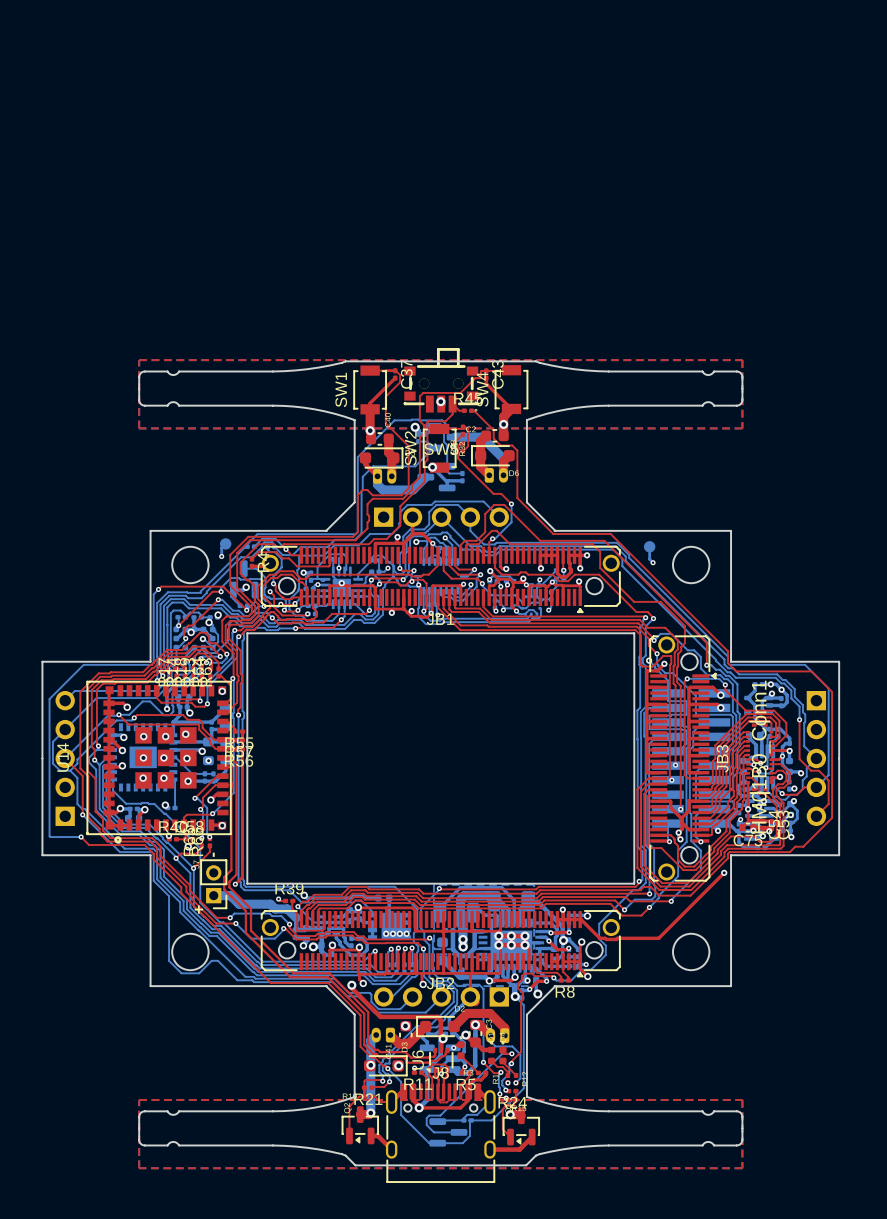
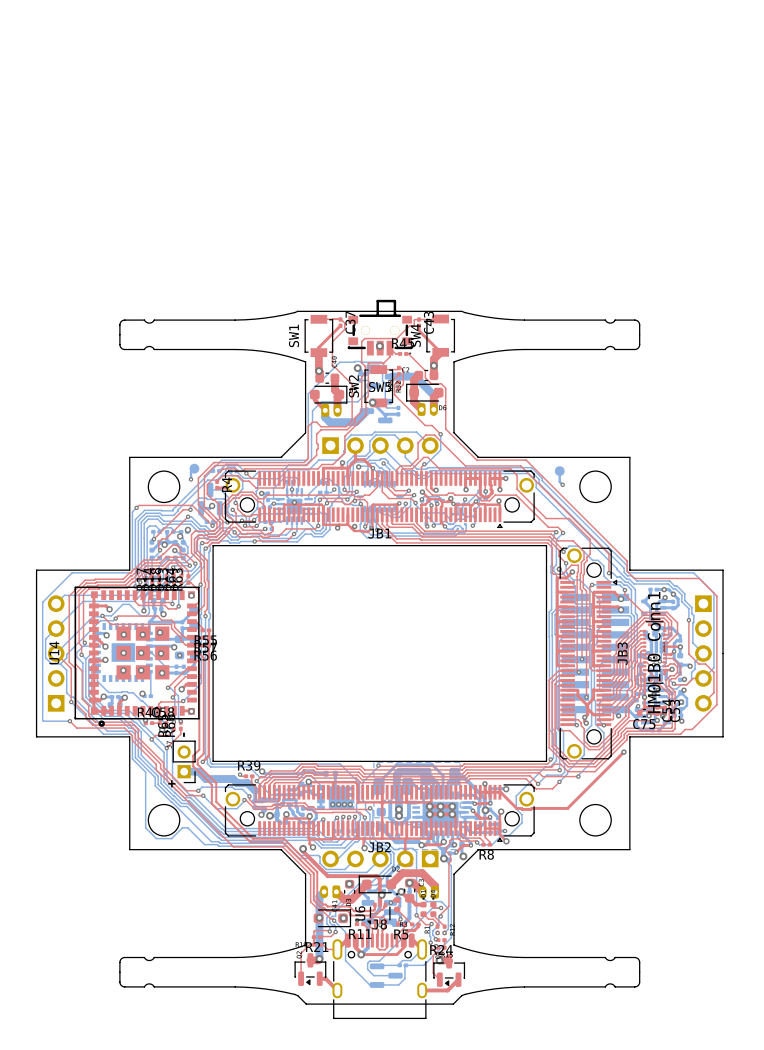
top zone outline: (139, 360) (742, 360) (742, 428) (139, 428) (139, 360) -> none
top zone outline: (139, 1099) (139, 1168) (742, 1168) (742, 1099) (139, 1099) -> none

